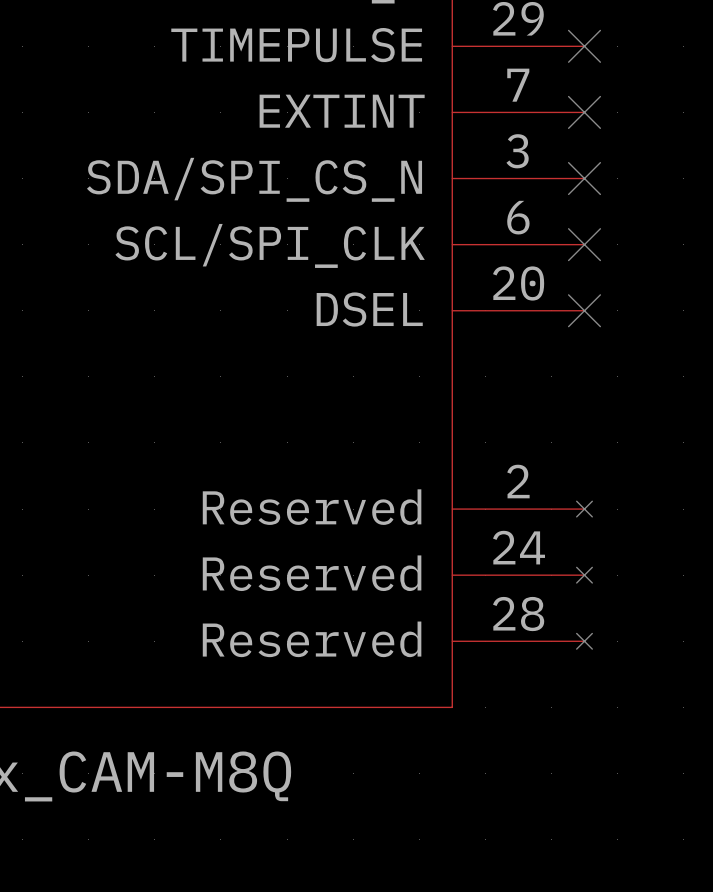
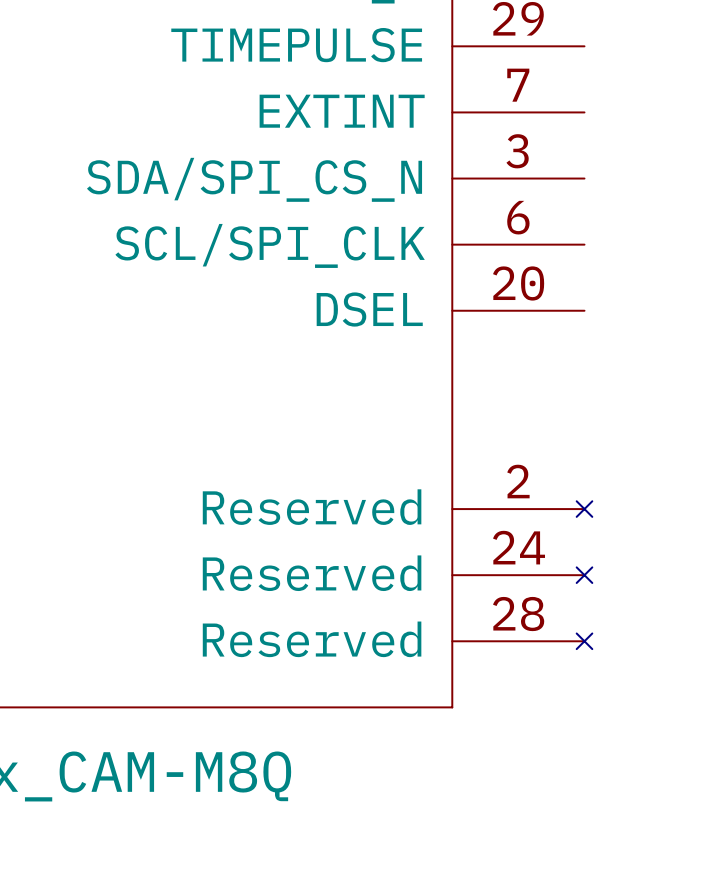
no-connect mark: (584, 46) -> none
no-connect mark: (584, 112) -> none
no-connect mark: (584, 178) -> none
no-connect mark: (584, 244) -> none
no-connect mark: (584, 310) -> none

